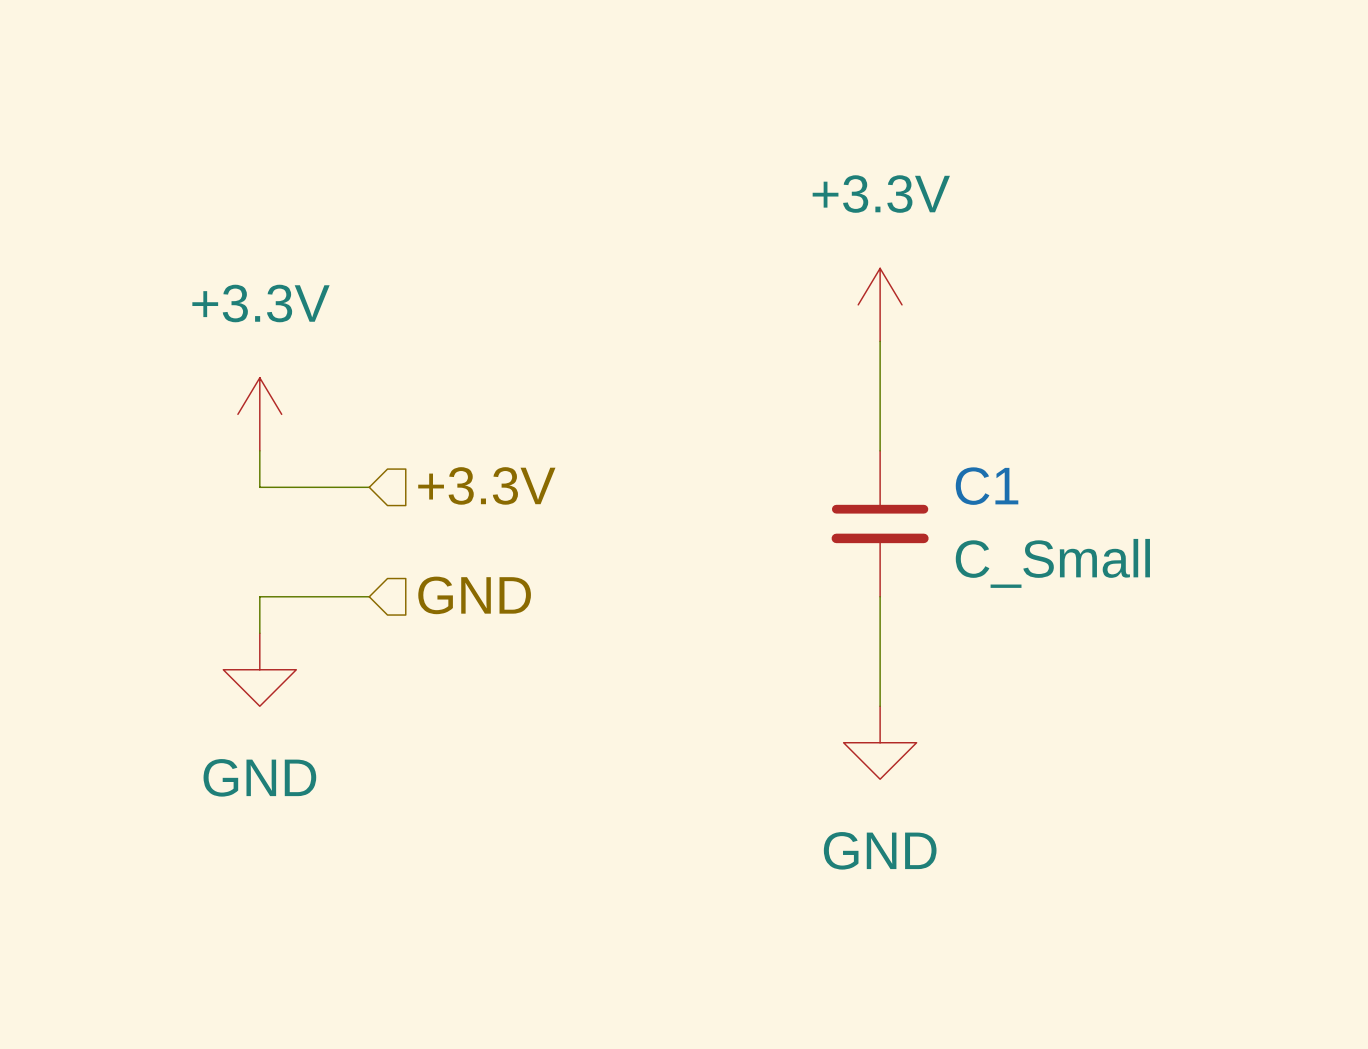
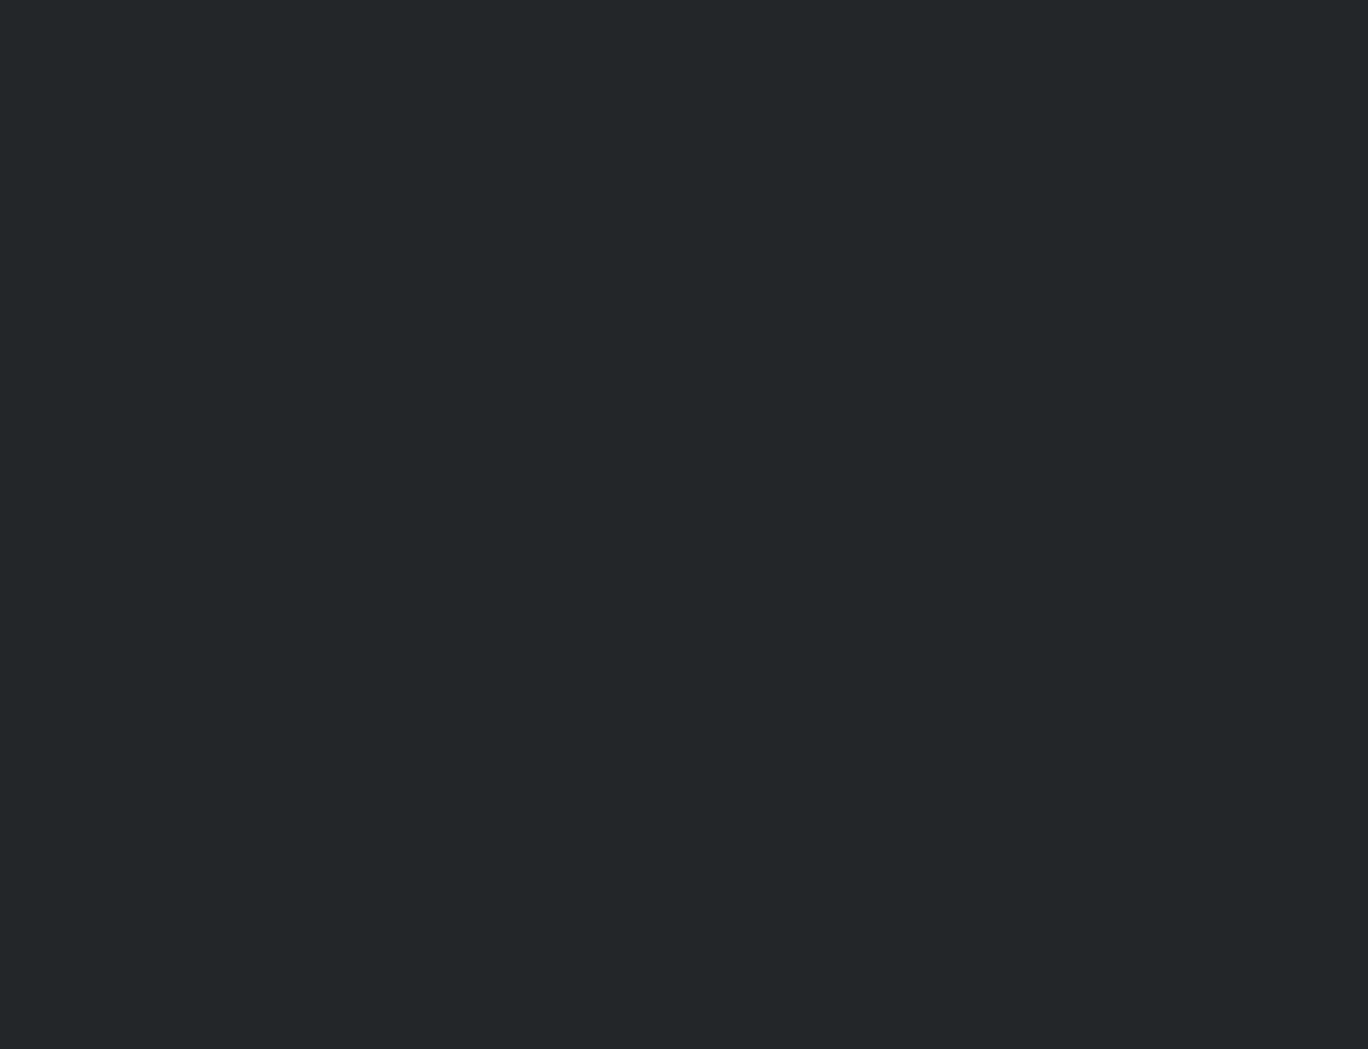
power symbol: +3.3V (880, 304) -> none
wire: (880, 341) (880, 450) -> none
power symbol: +3.3V (259, 414) -> none
wire: (259, 450) (259, 487) (369, 487) -> none
hierarchical label: +3.3V (486, 485) -> none
C1: C_Small (880, 523) -> none
hierarchical label: GND (474, 595) -> none
wire: (369, 596) (259, 596) (259, 633) -> none
wire: (880, 596) (880, 706) -> none
power symbol: GND (259, 669) -> none
power symbol: GND (880, 742) -> none

